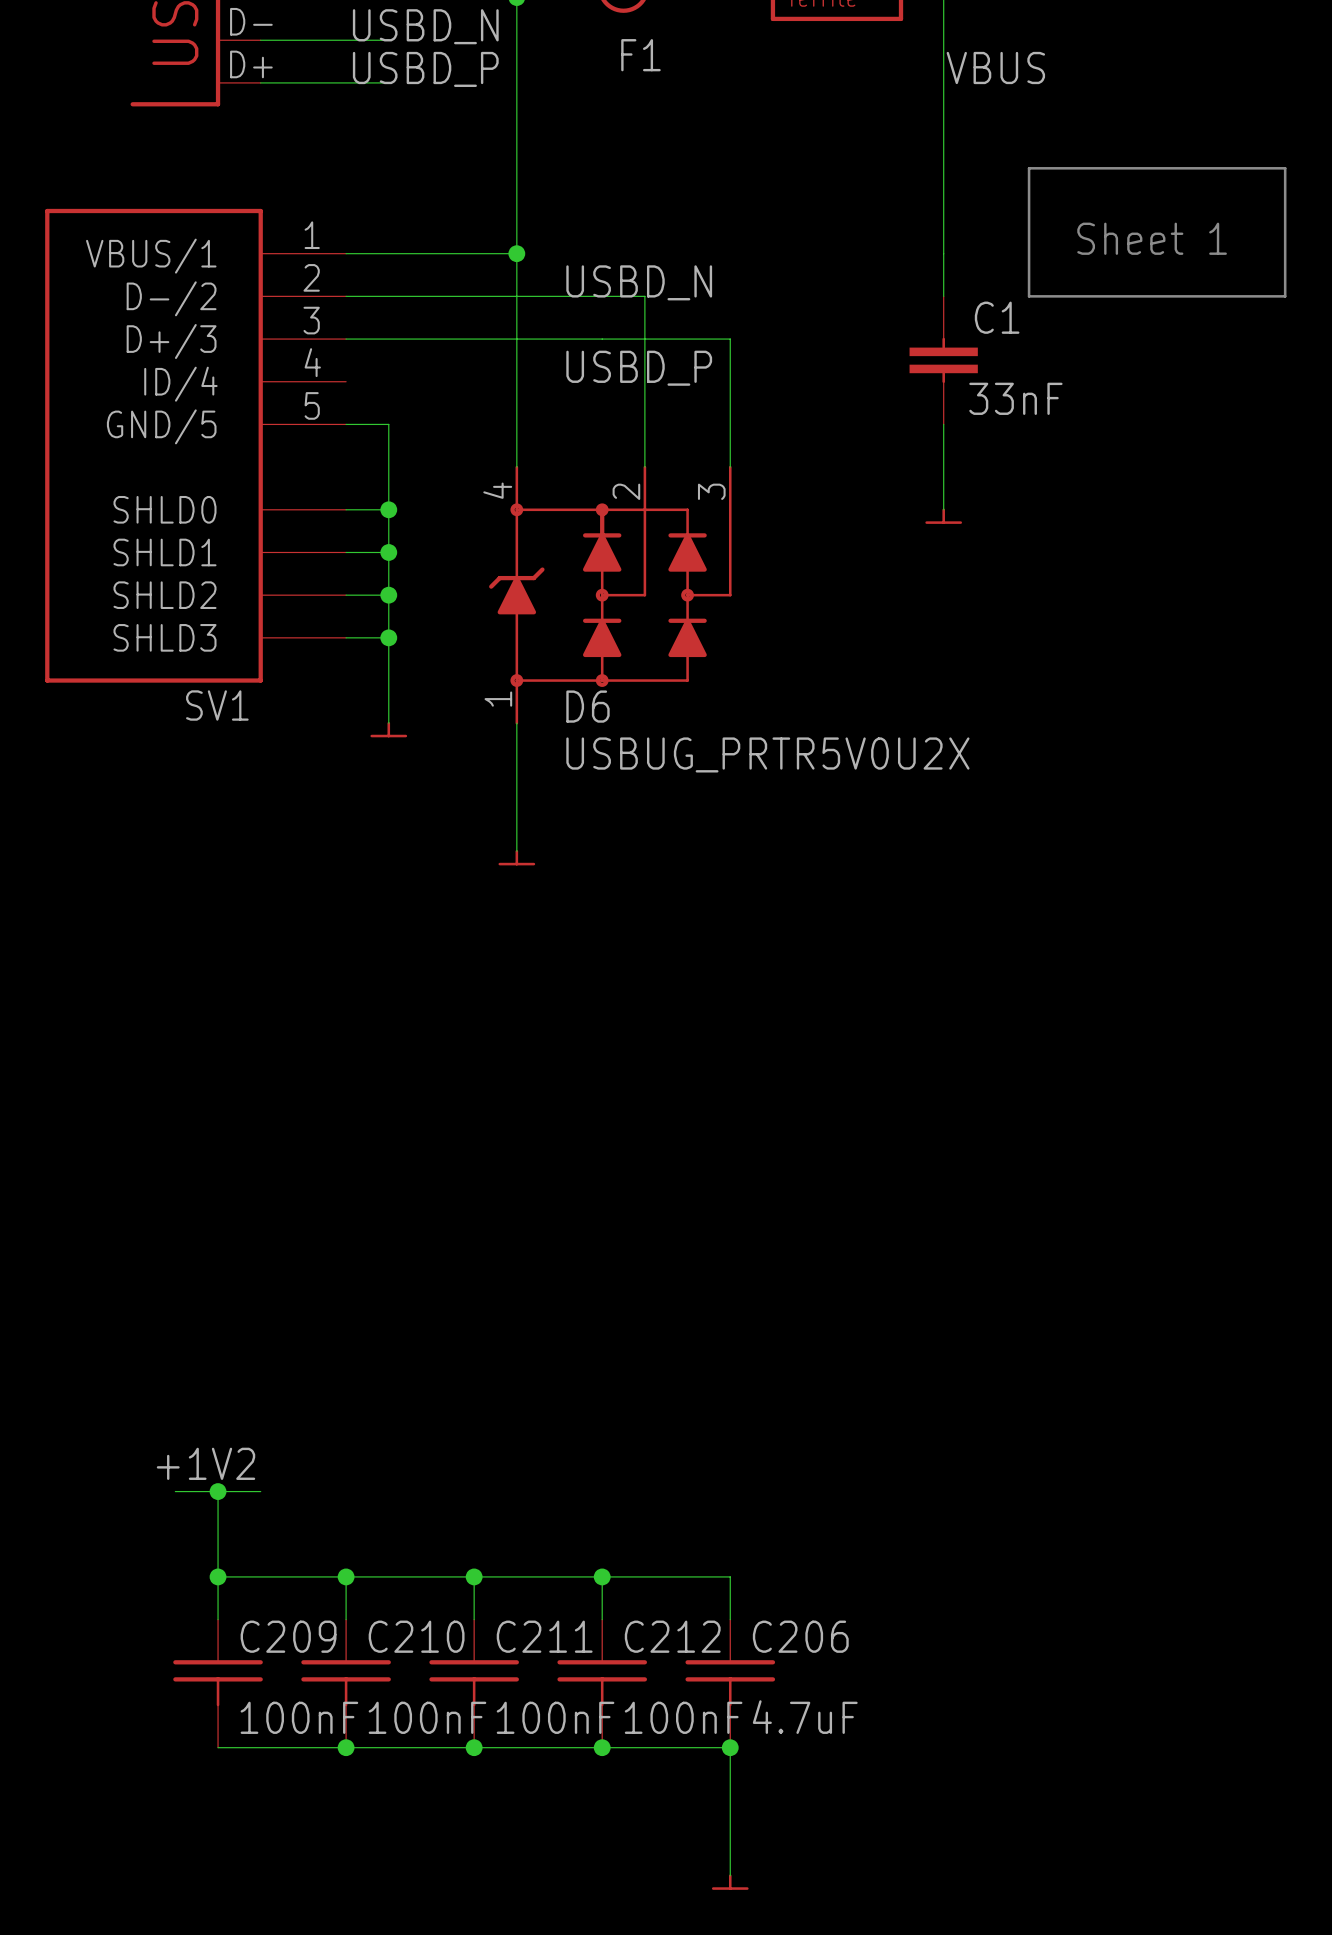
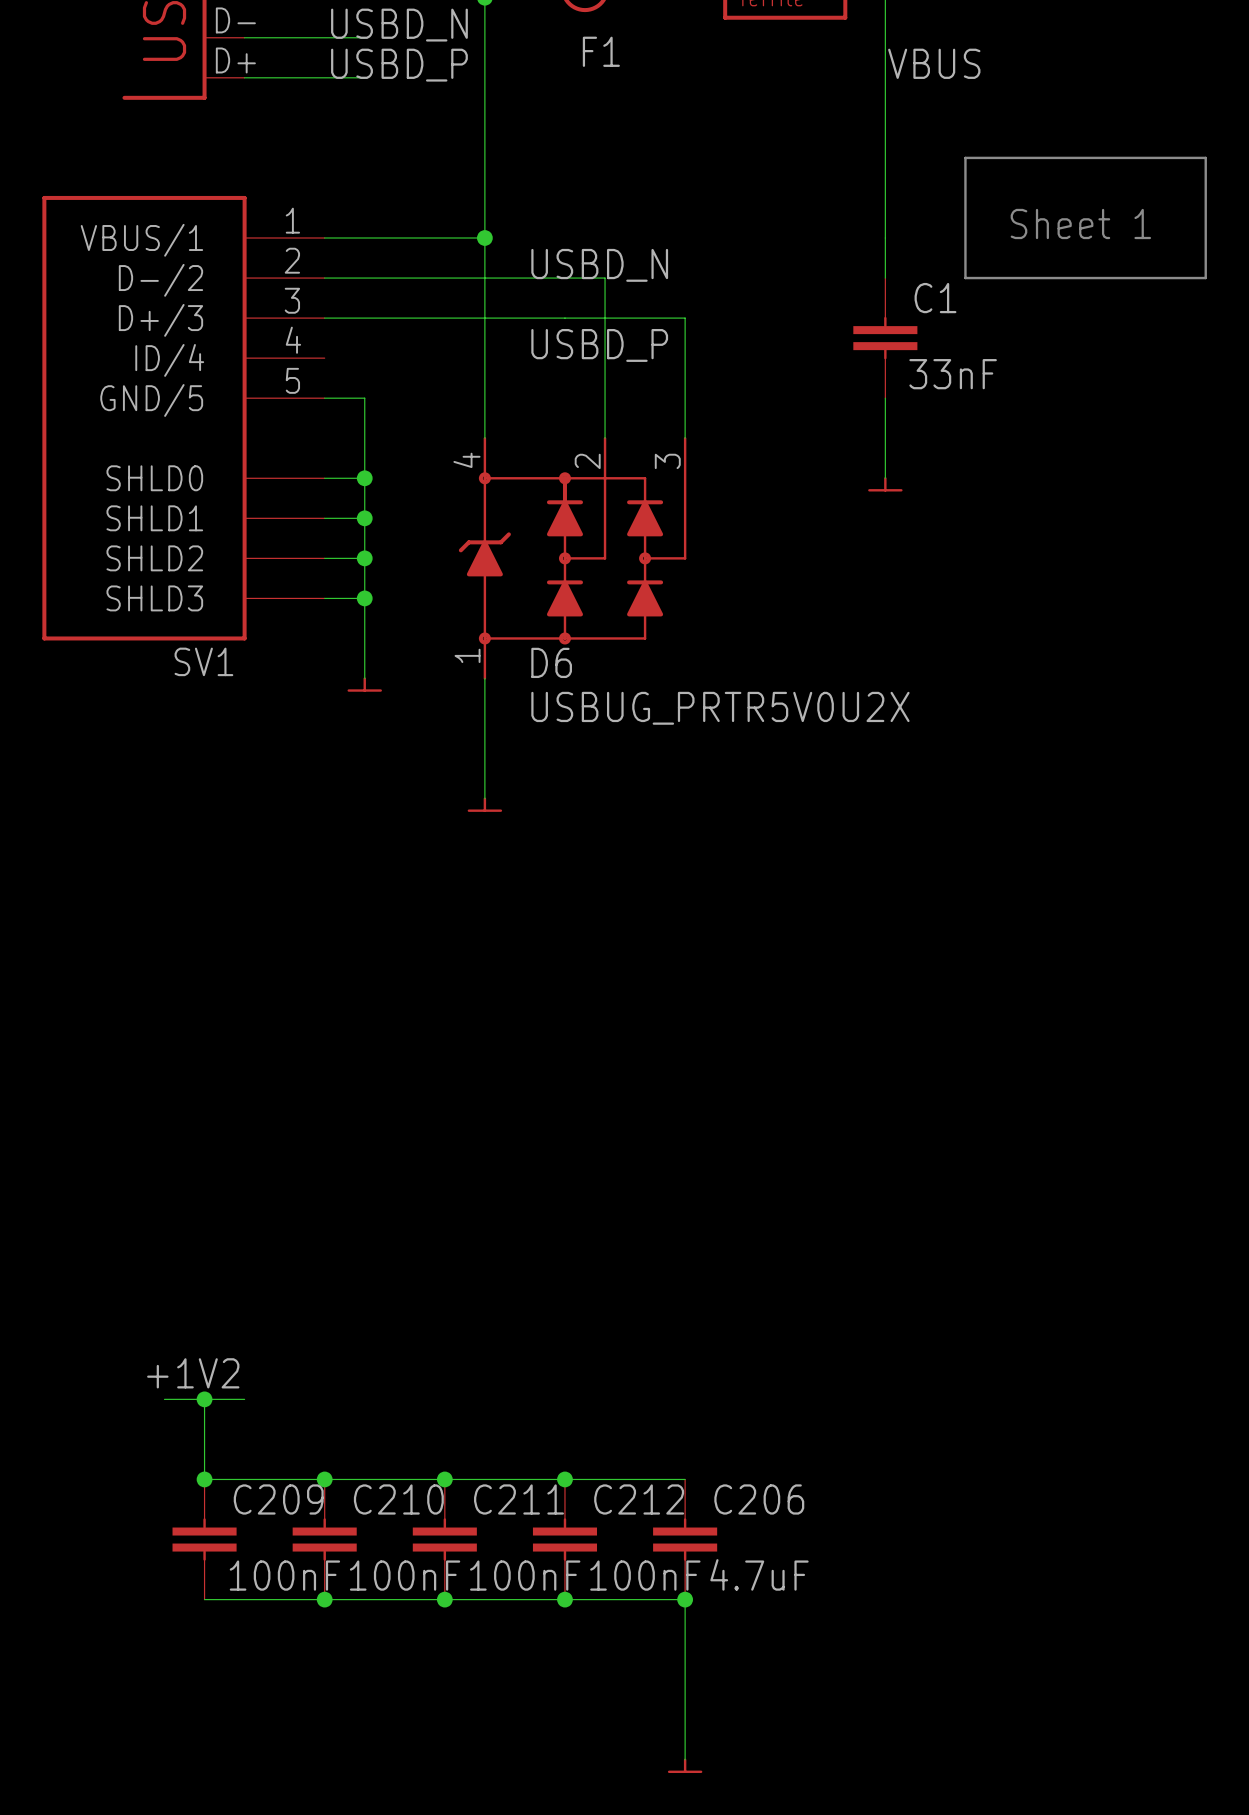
C209 symbol: [173, 1619, 263, 1748] -> [172, 1479, 237, 1600]
C210 symbol: [301, 1619, 391, 1748] -> [292, 1479, 357, 1600]
C211 symbol: [429, 1619, 519, 1748] -> [412, 1479, 477, 1600]
C212 symbol: [557, 1619, 648, 1748] -> [532, 1479, 598, 1600]
C206 symbol: [685, 1619, 776, 1748] -> [653, 1479, 718, 1600]
wire: (218, 1747) (730, 1747) -> (204, 1599) (685, 1599) (685, 1639)
junction position: (346, 1747) -> (324, 1599)
junction position: (474, 1747) -> (444, 1599)
junction position: (602, 1747) -> (564, 1599)
junction position: (730, 1747) -> (685, 1599)

